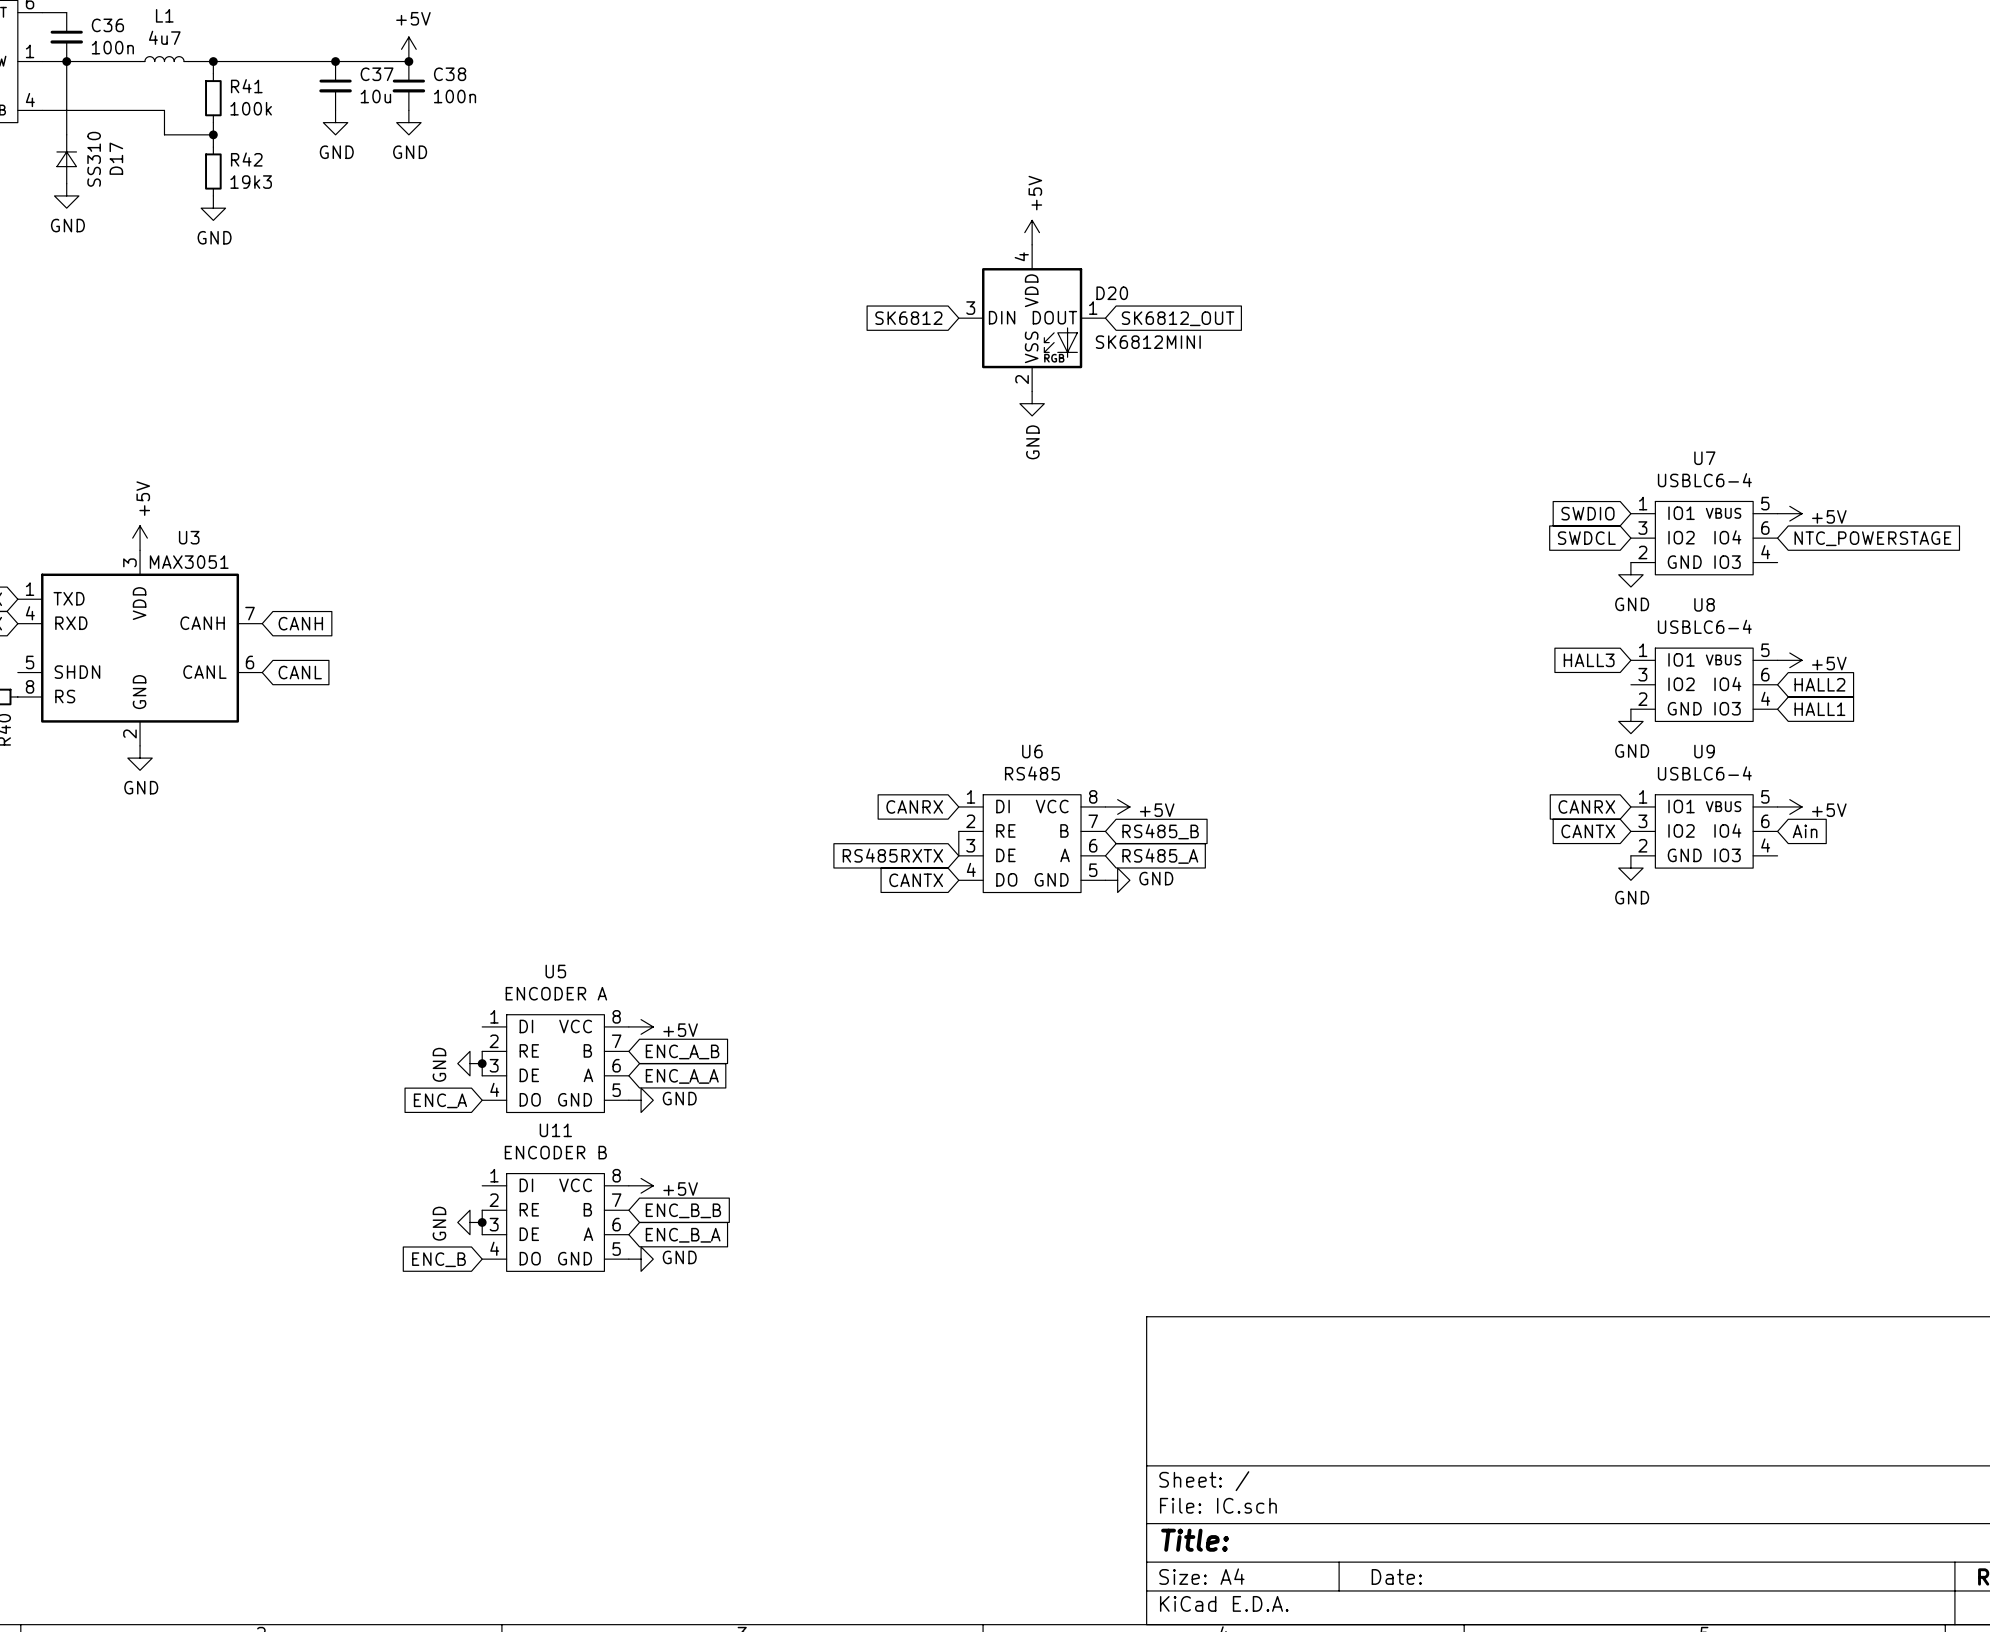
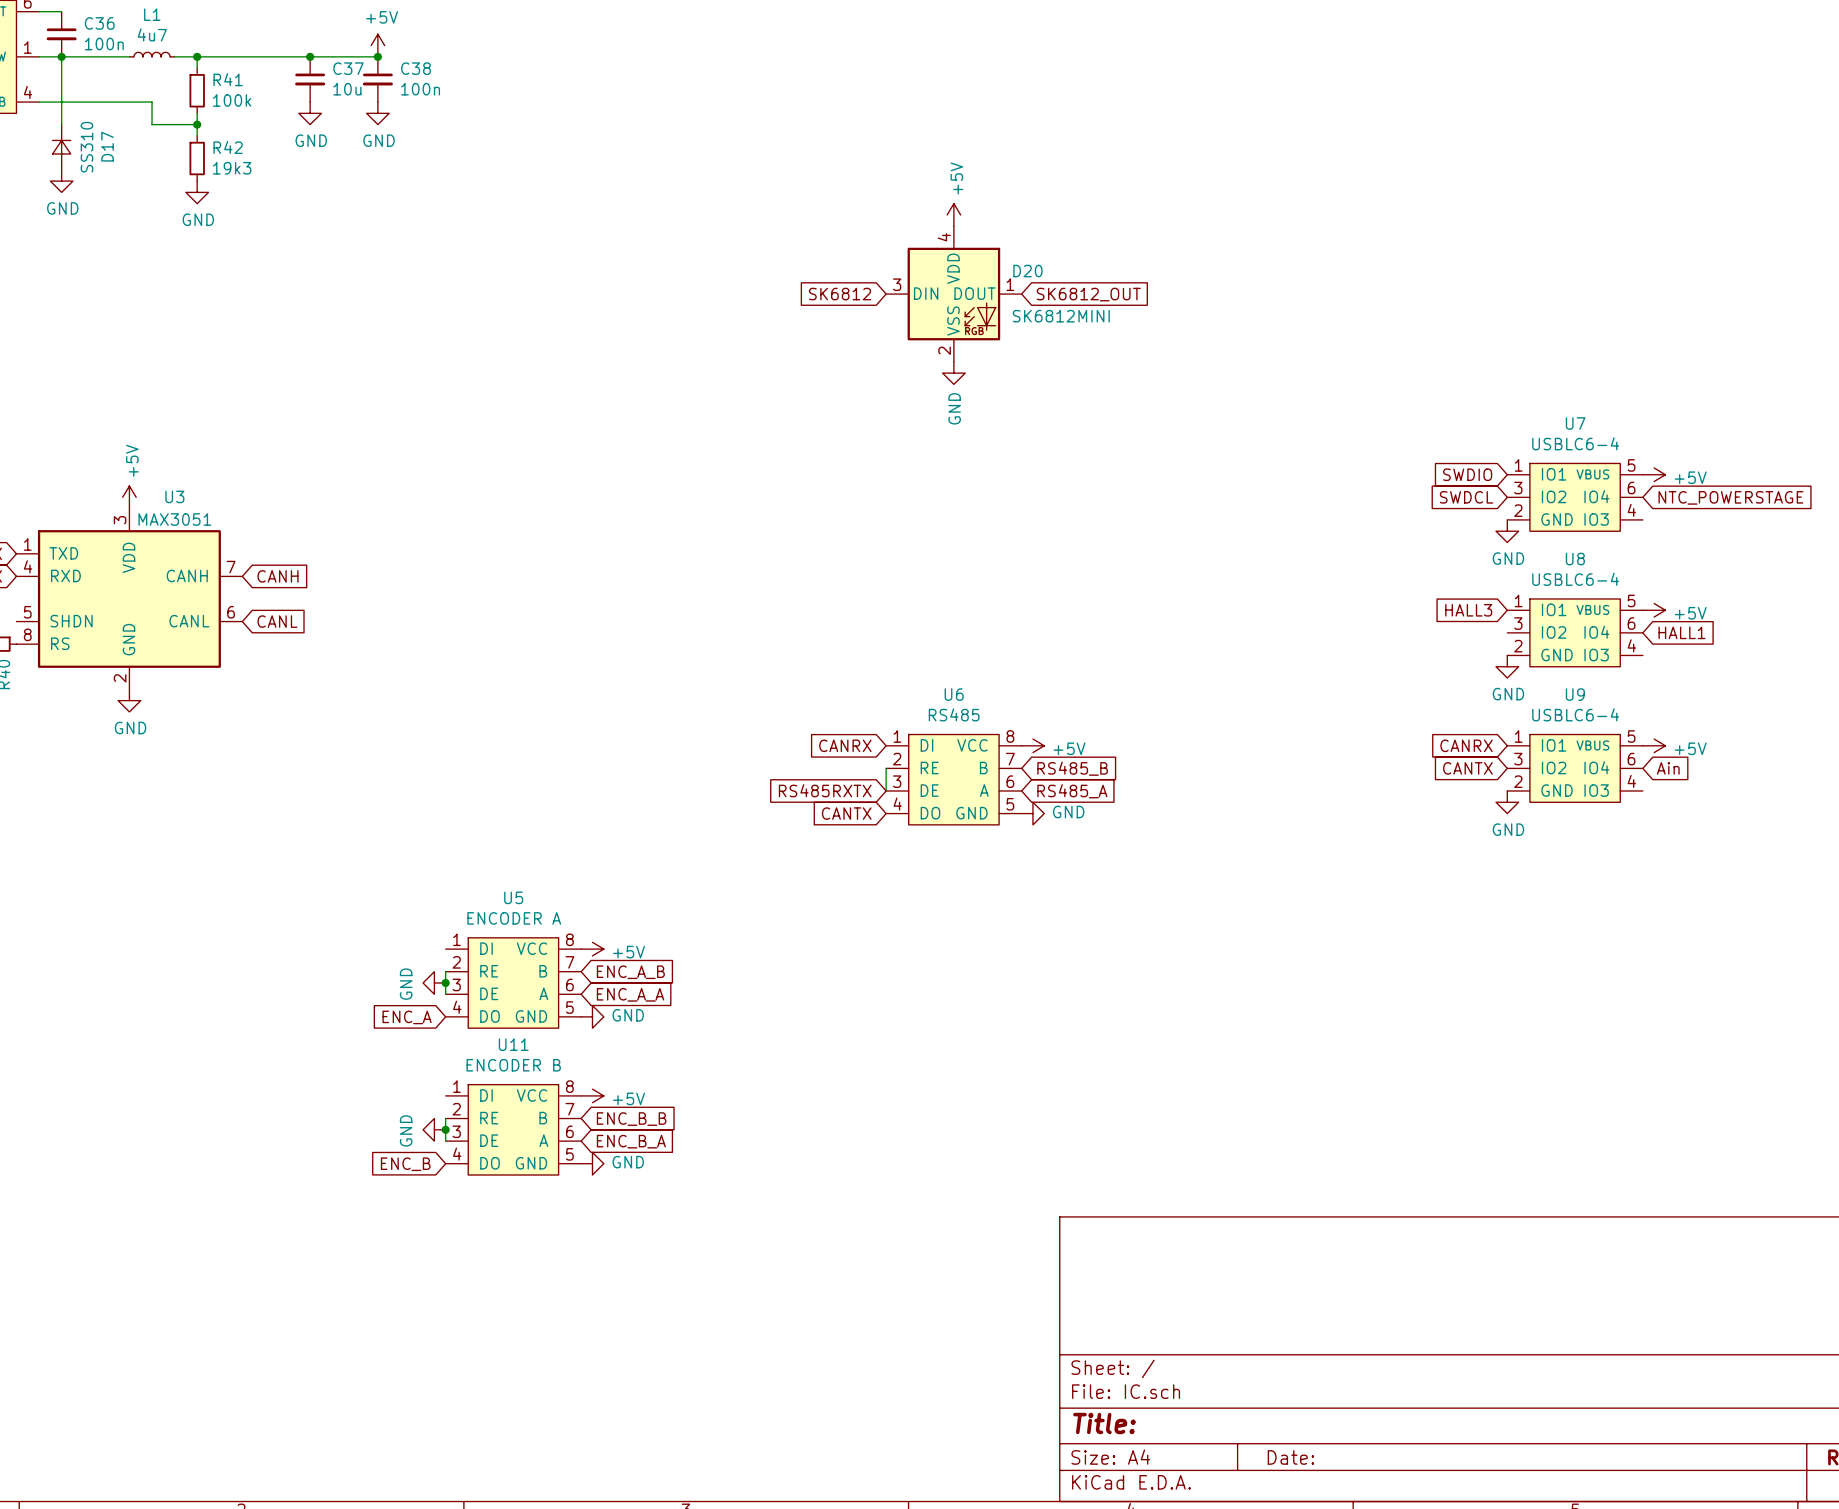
global label: HALL2 (1819, 684) -> HALL1 (1681, 632)
global label: HALL1 (1819, 709) -> none

